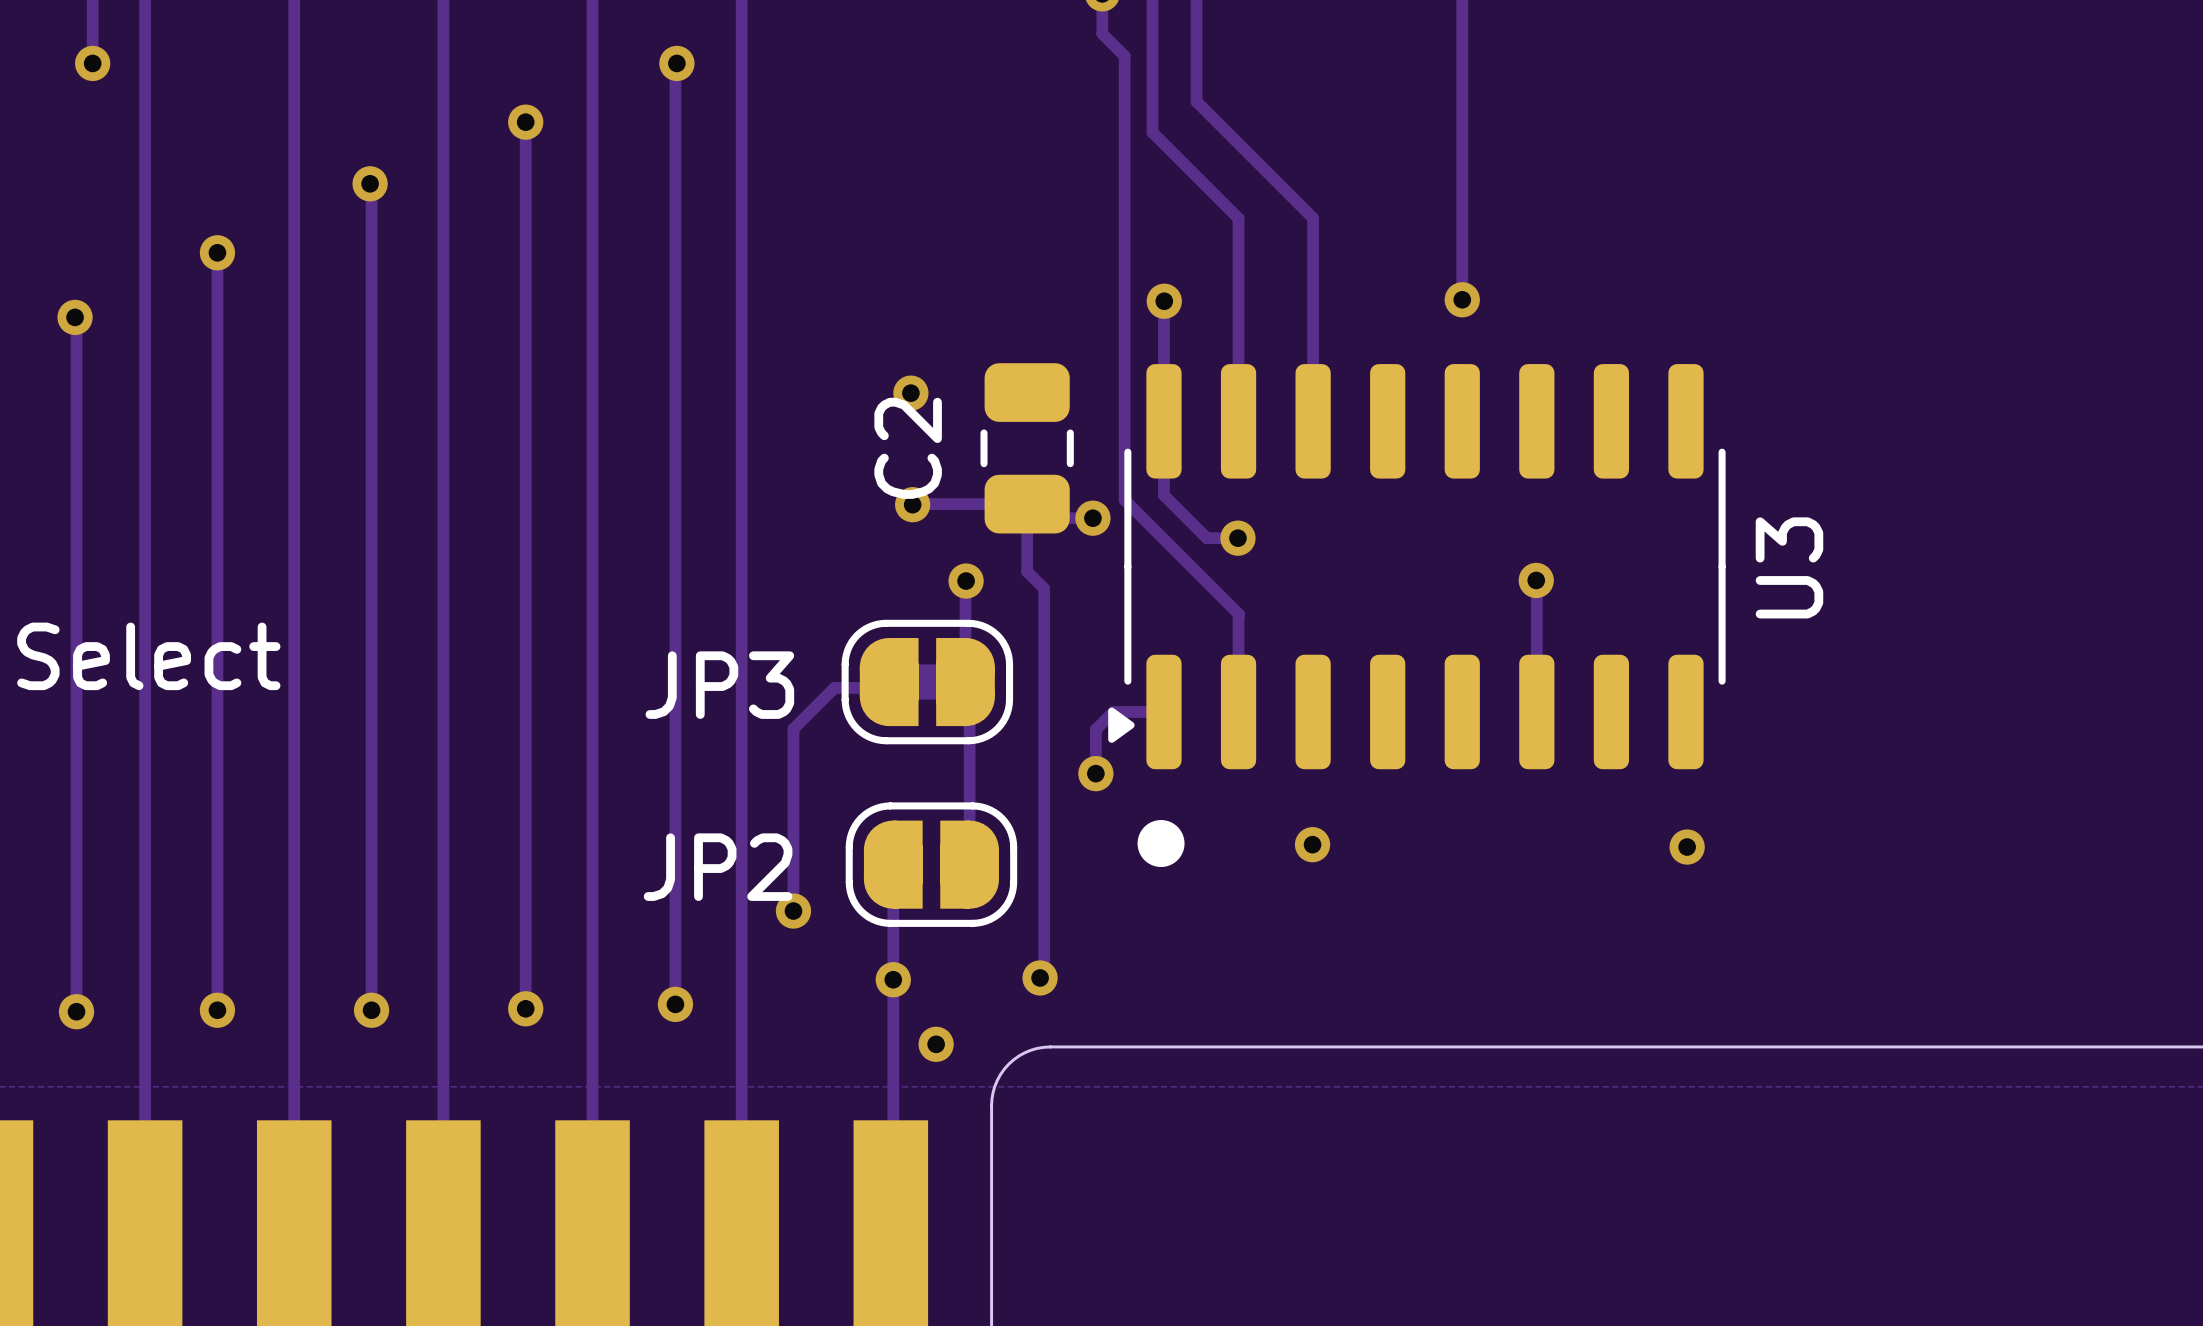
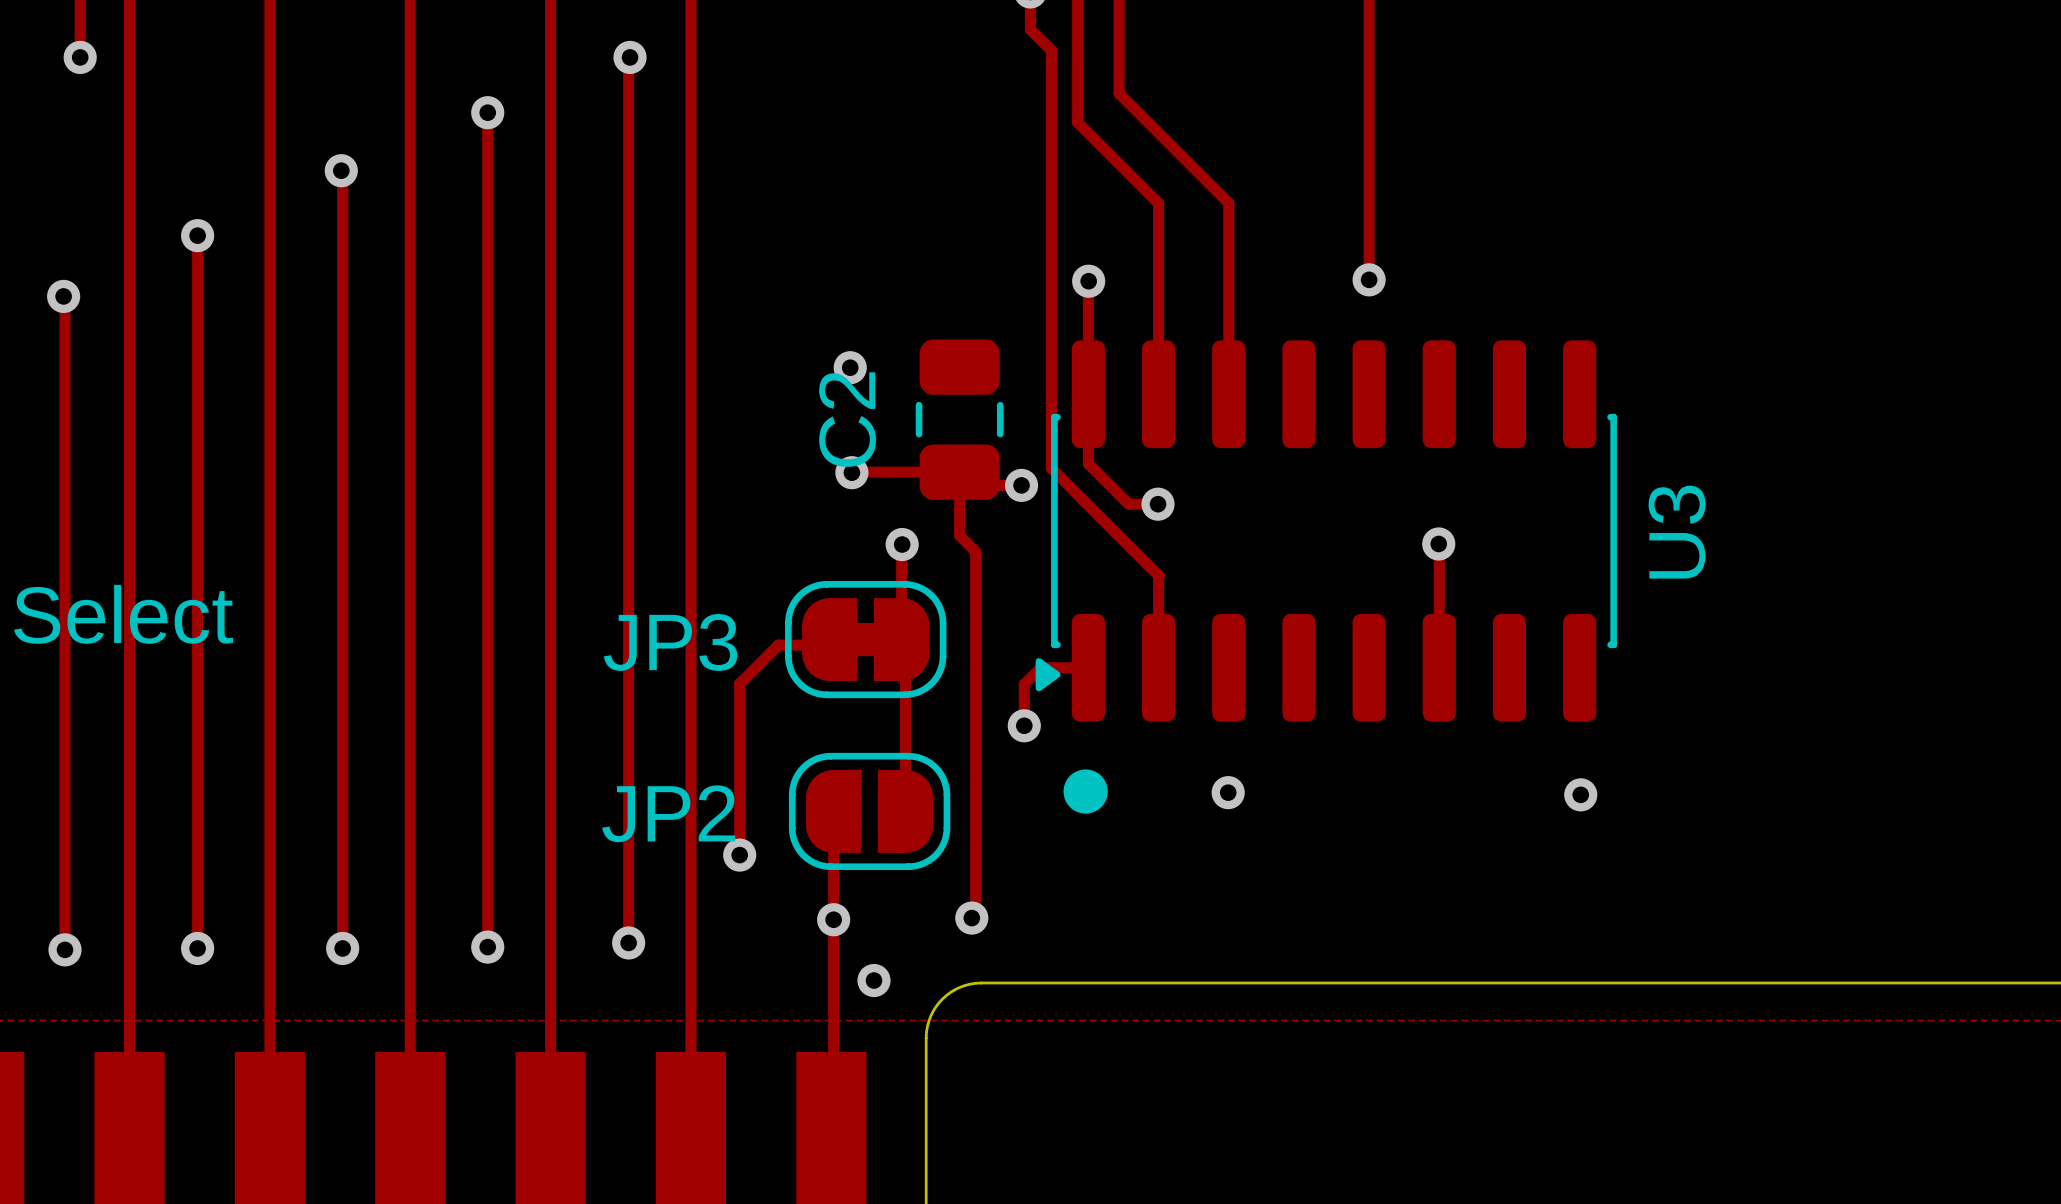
U3 footprint: [1108, 364, 1726, 770] -> [1035, 340, 1617, 722]

